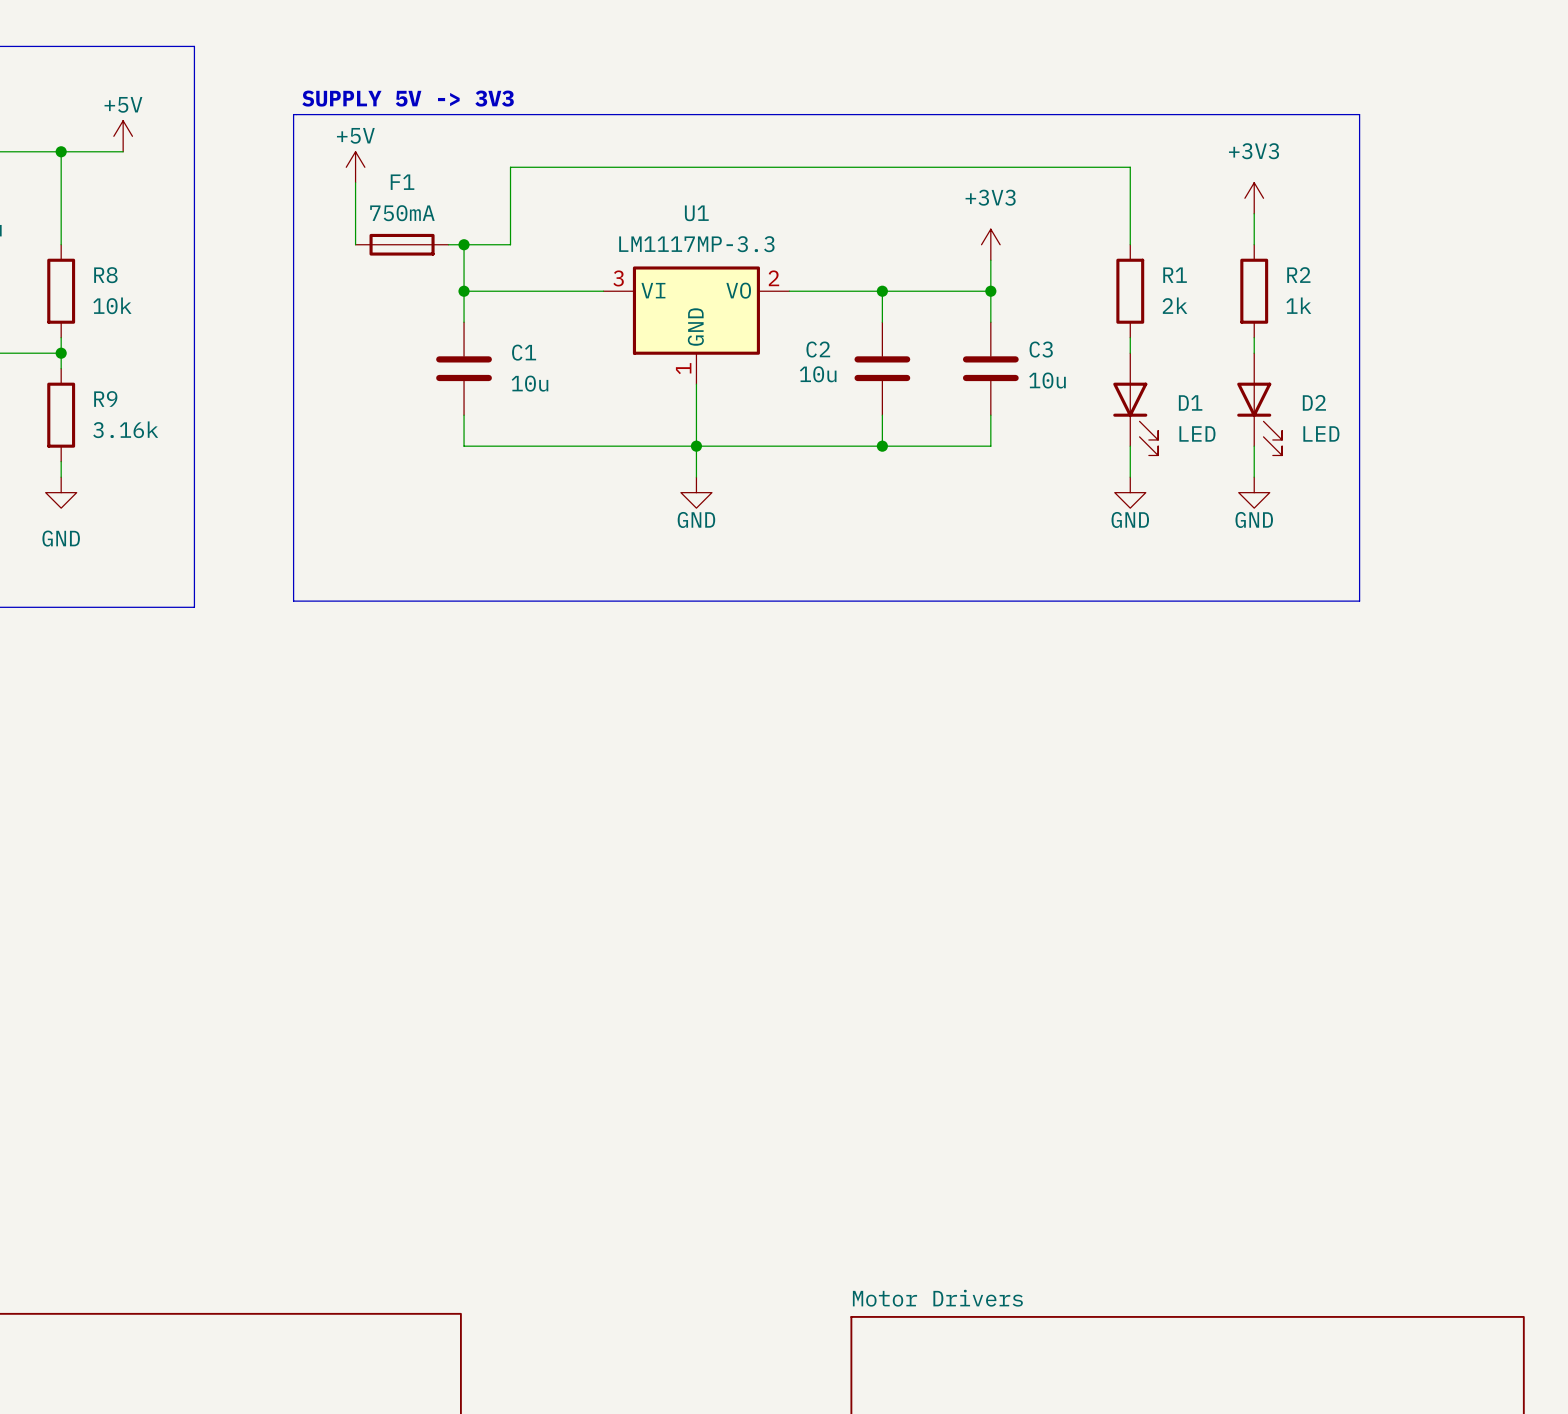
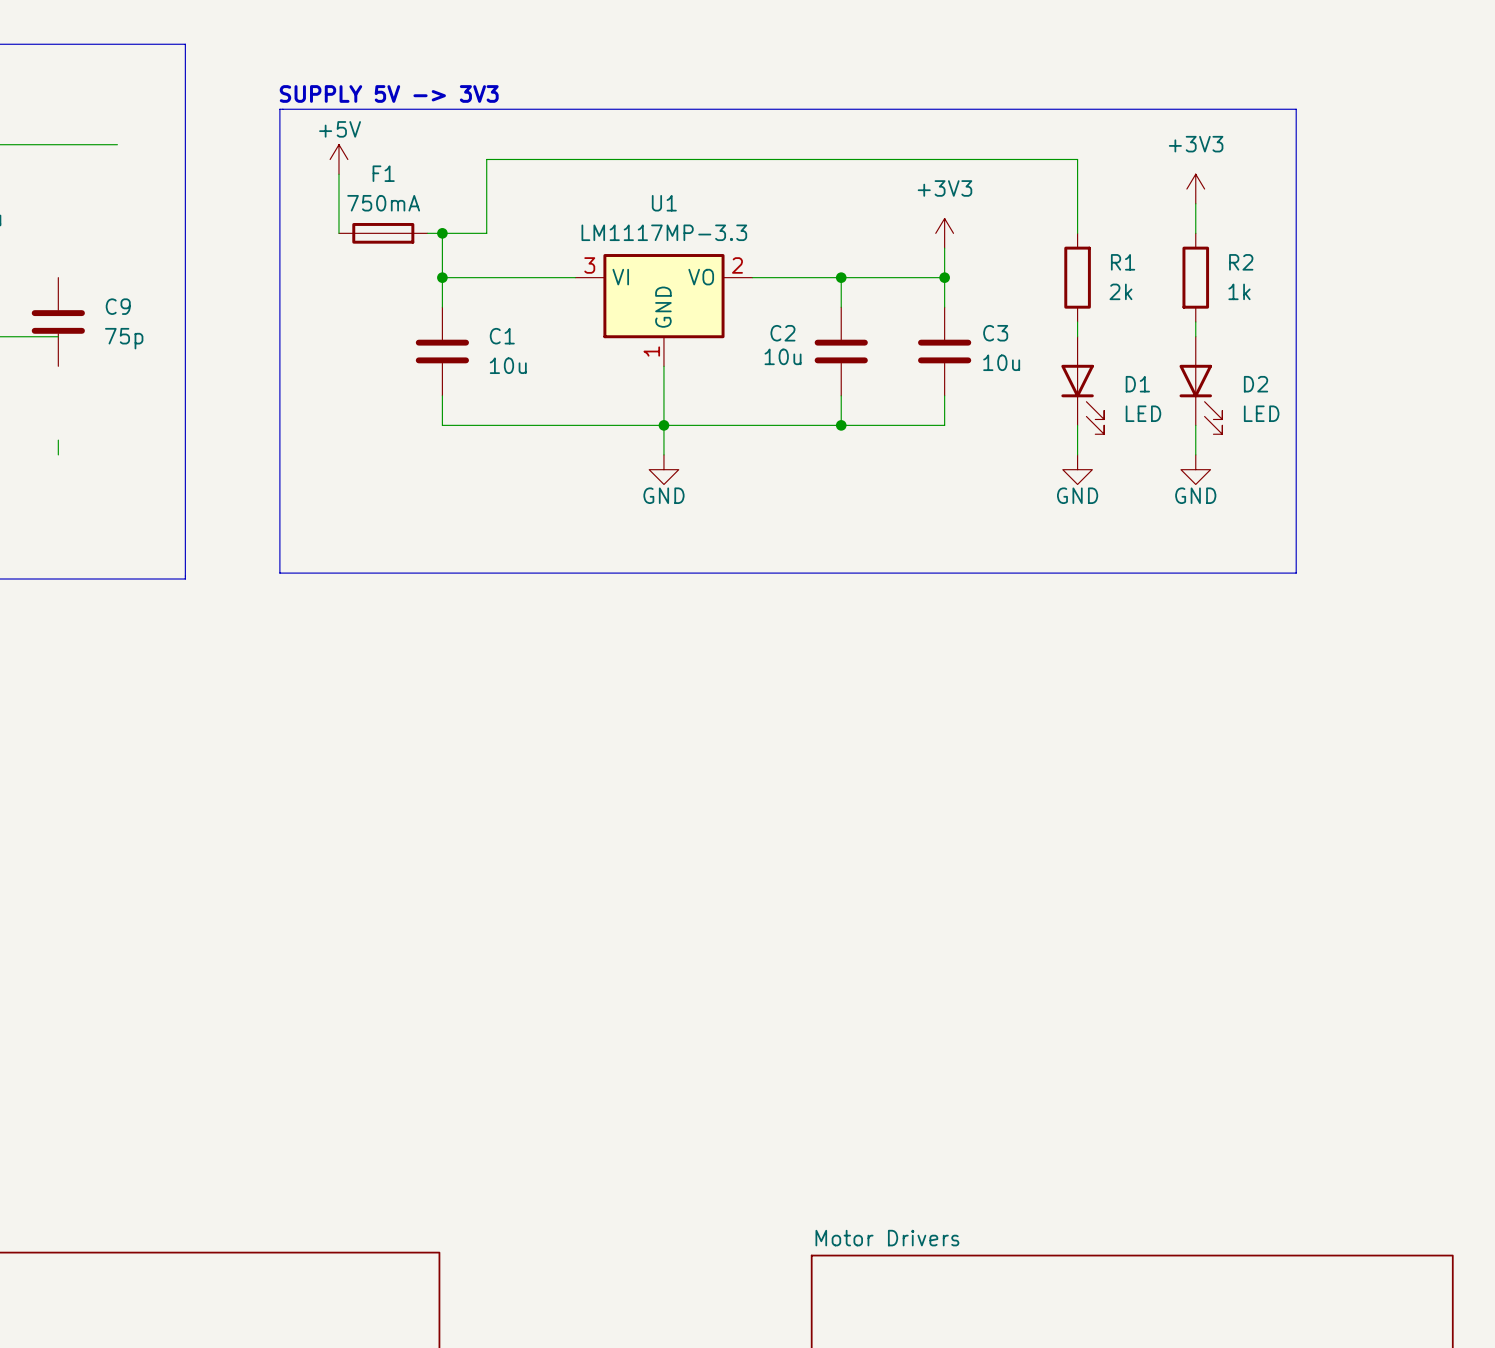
power symbol: +5V (123, 136) -> none
wire: (61, 151) (61, 244) -> none
junction: (61, 151) -> none
R8: 10k (61, 291) -> none
C9: none -> 75p (58, 321)
junction: (61, 353) -> none
R9: 3.16k (61, 415) -> none
power symbol: GND (61, 492) -> none

